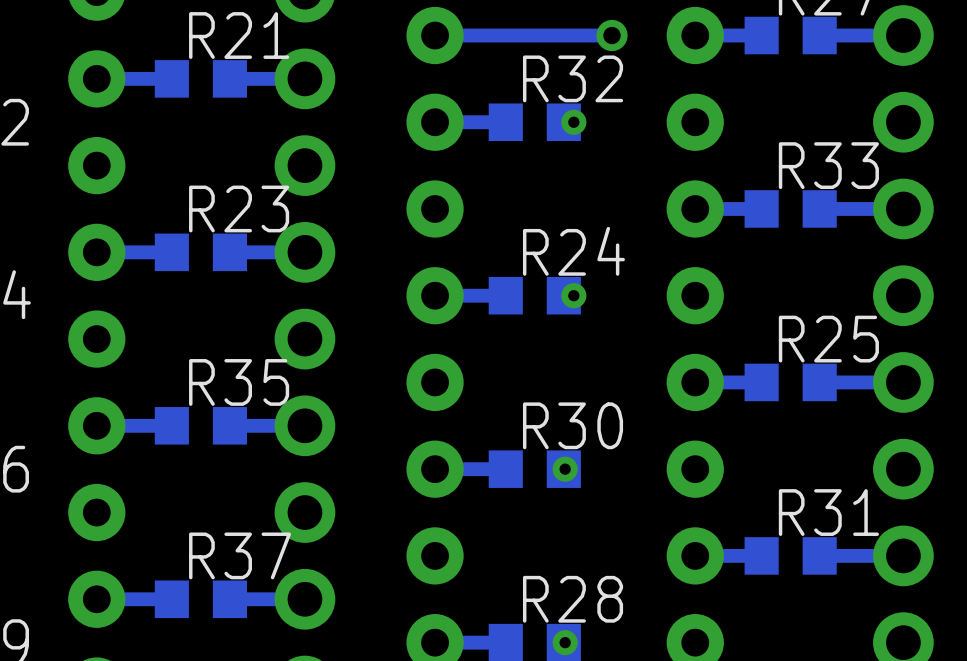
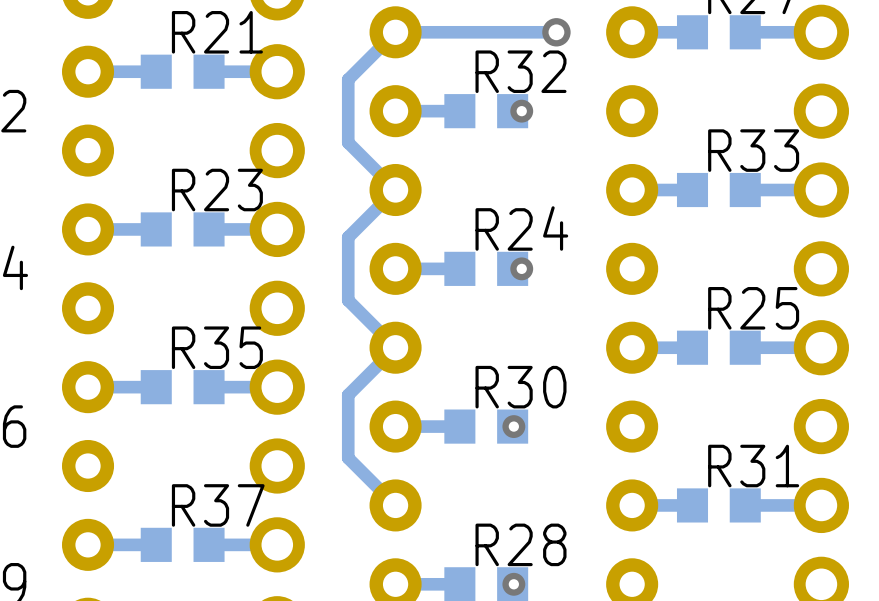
track: none -> (395, 32) (348, 79) (348, 142) (395, 190) (348, 237) (348, 300) (395, 347) (348, 395) (348, 458) (395, 505)

